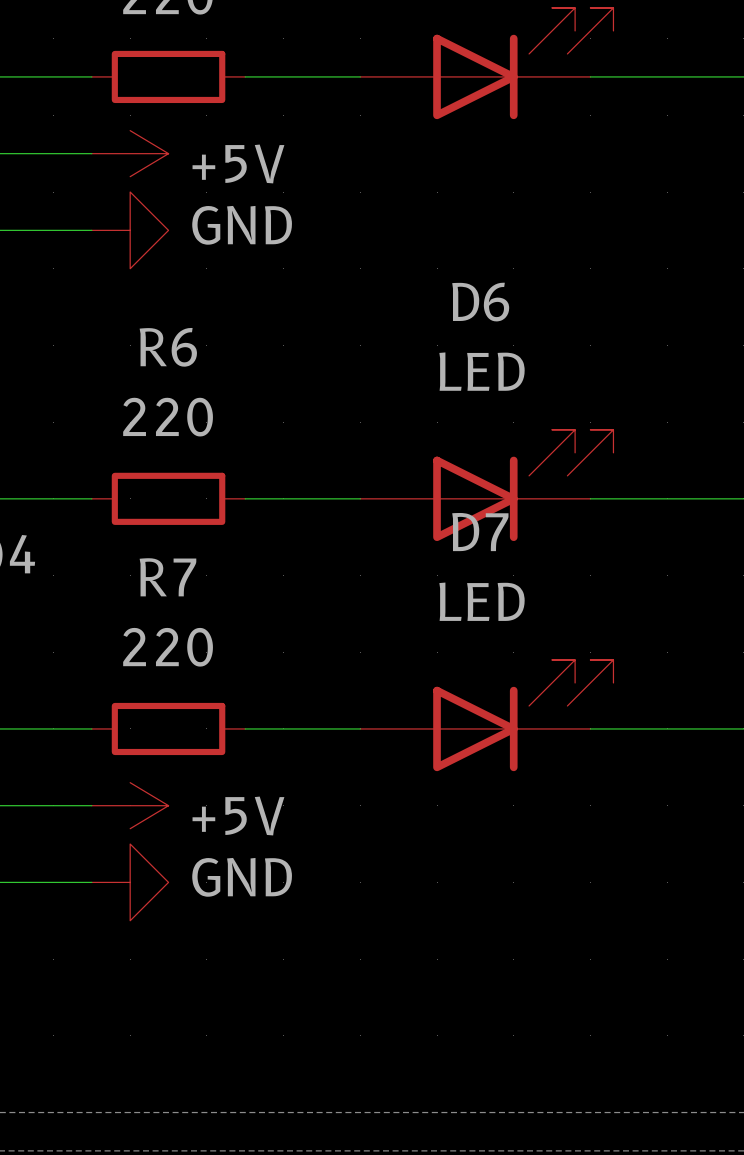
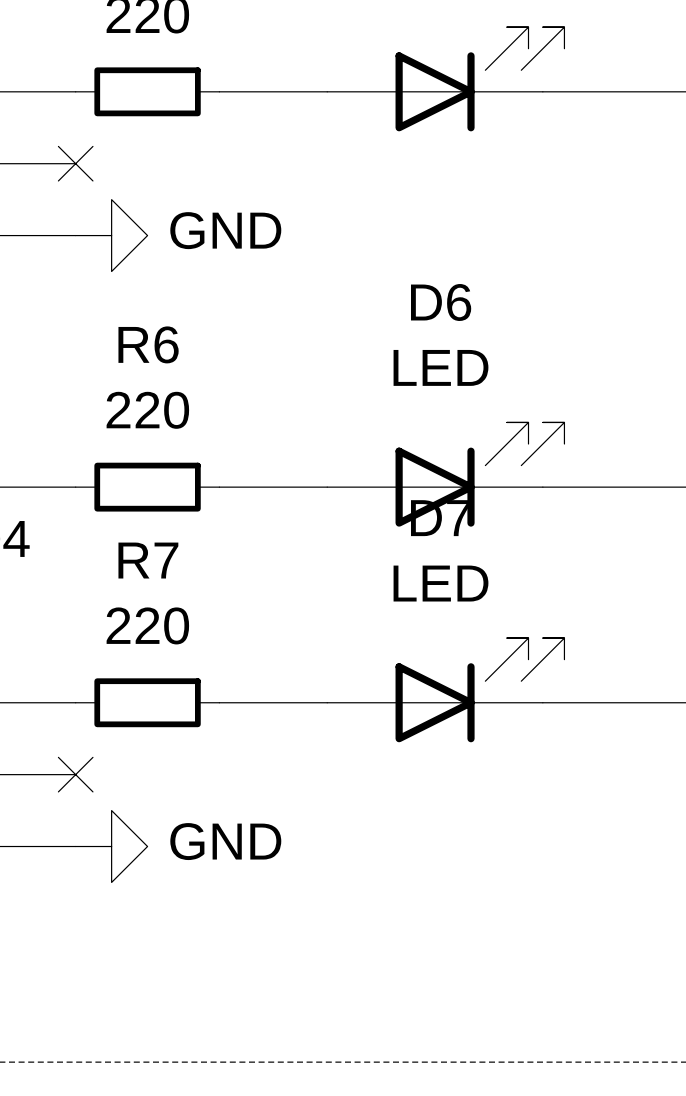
no-connect mark: none -> (75, 163)
power symbol: +5V (130, 153) -> none
no-connect mark: none -> (75, 774)
power symbol: +5V (130, 805) -> none

